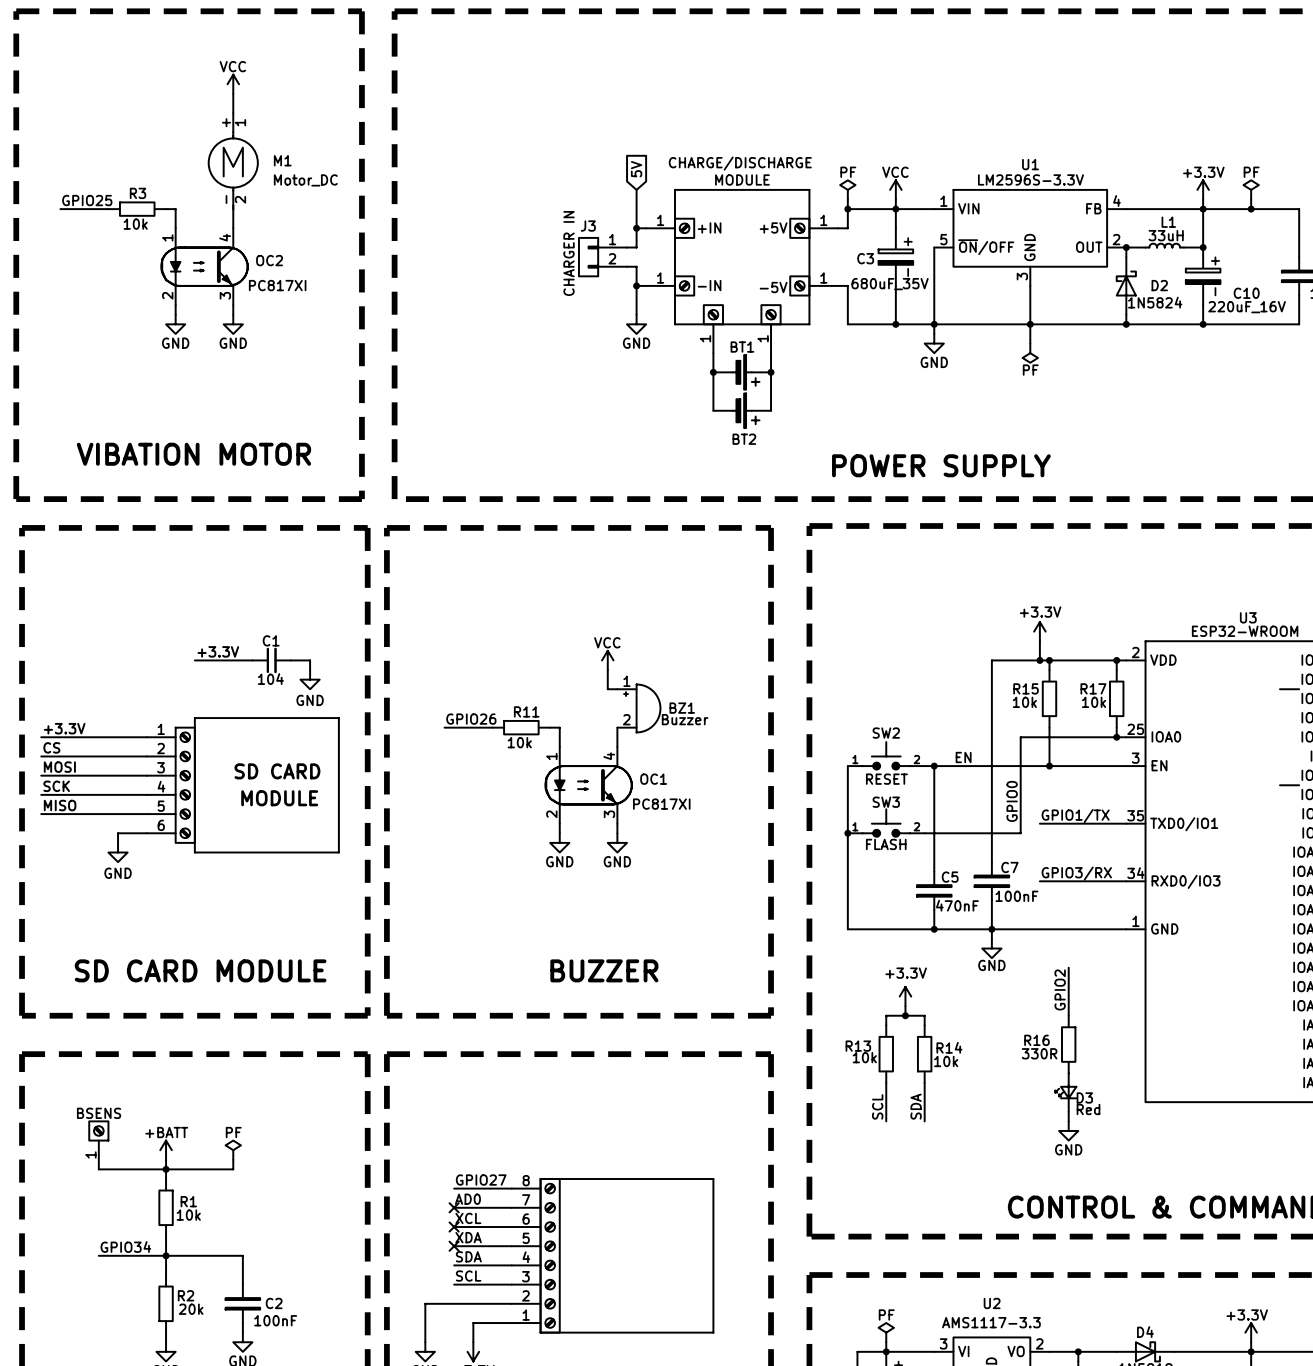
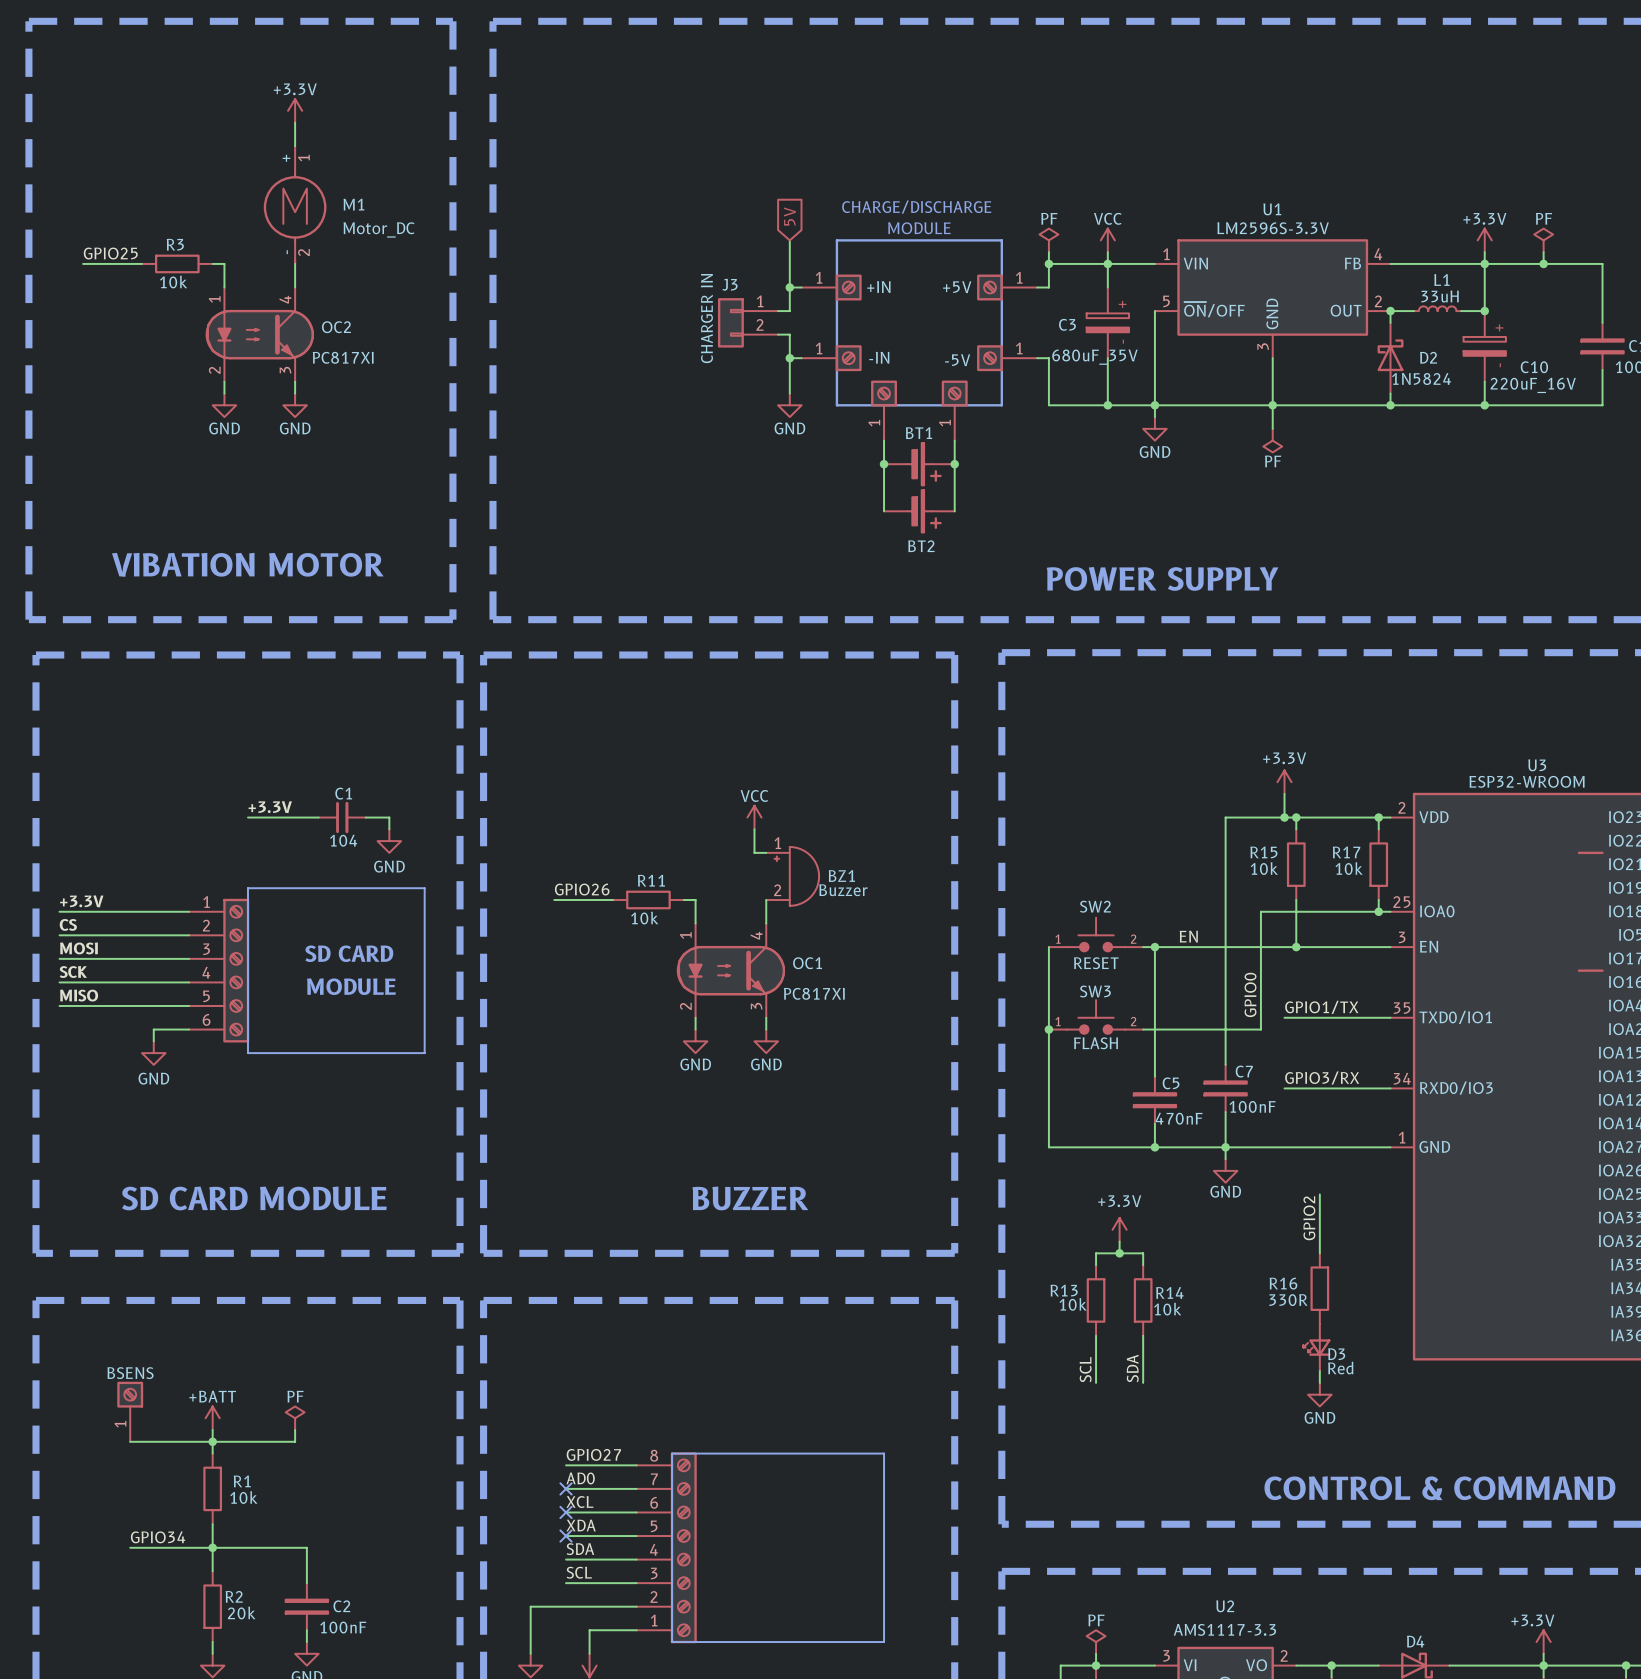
power symbol: VCC (233, 84) -> +3.3V (295, 110)

